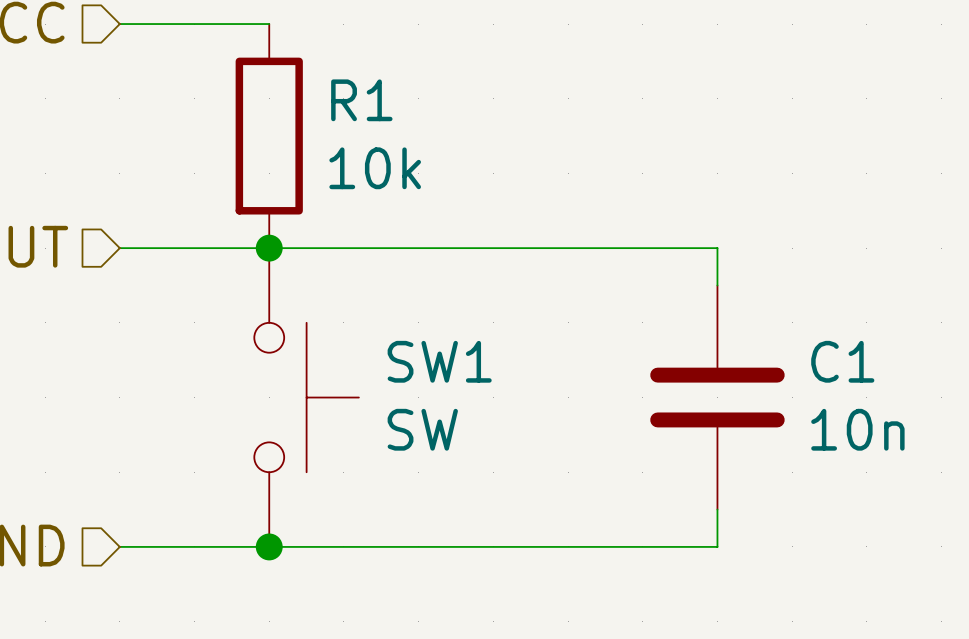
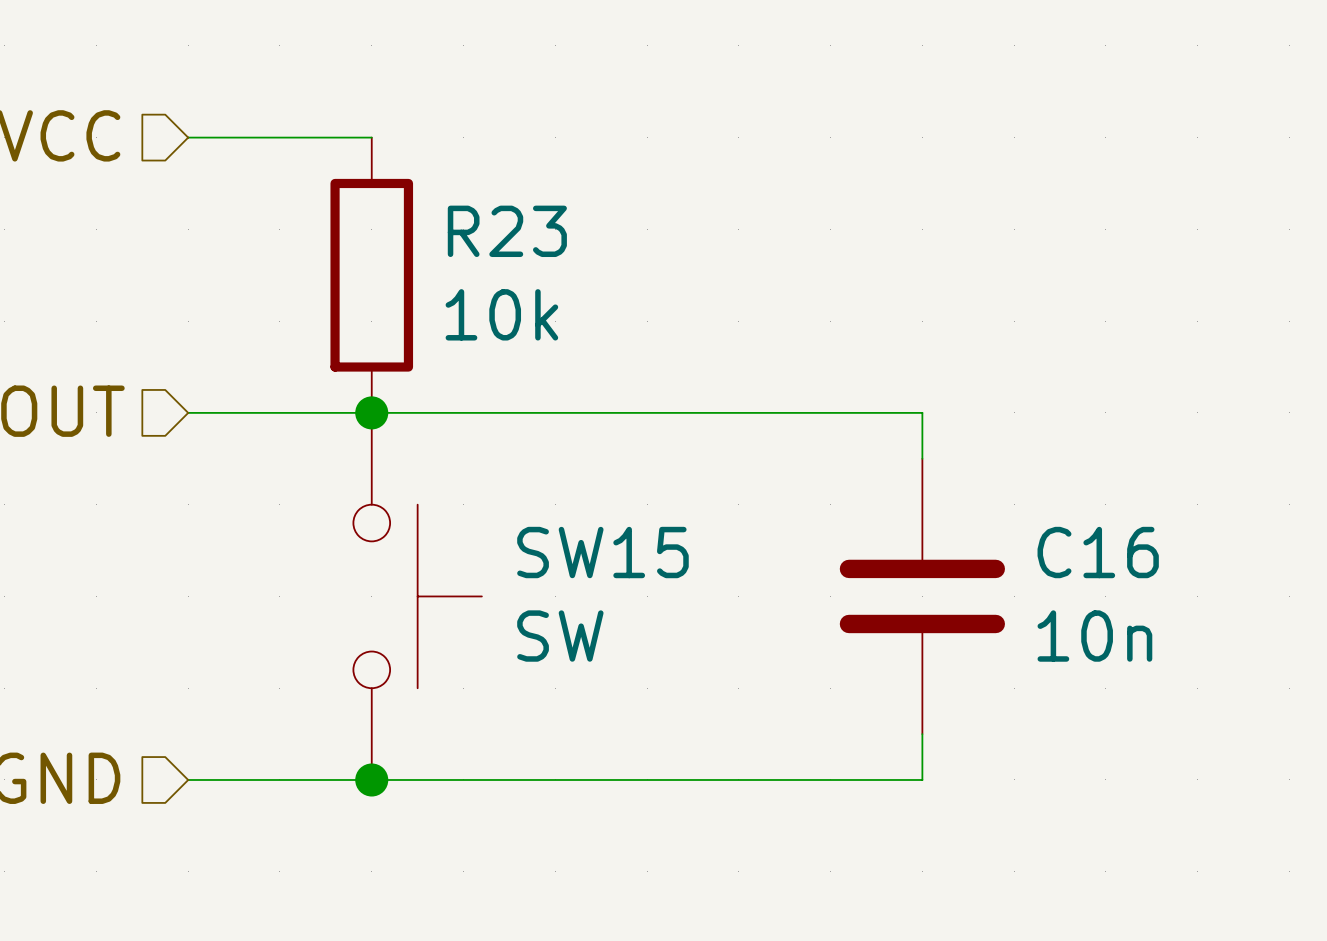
R1 name: R1 (361, 100) -> R23 (507, 231)
SW1 name: SW1 (439, 361) -> SW15 (602, 552)
C1 name: C1 (842, 361) -> C16 (1098, 552)

